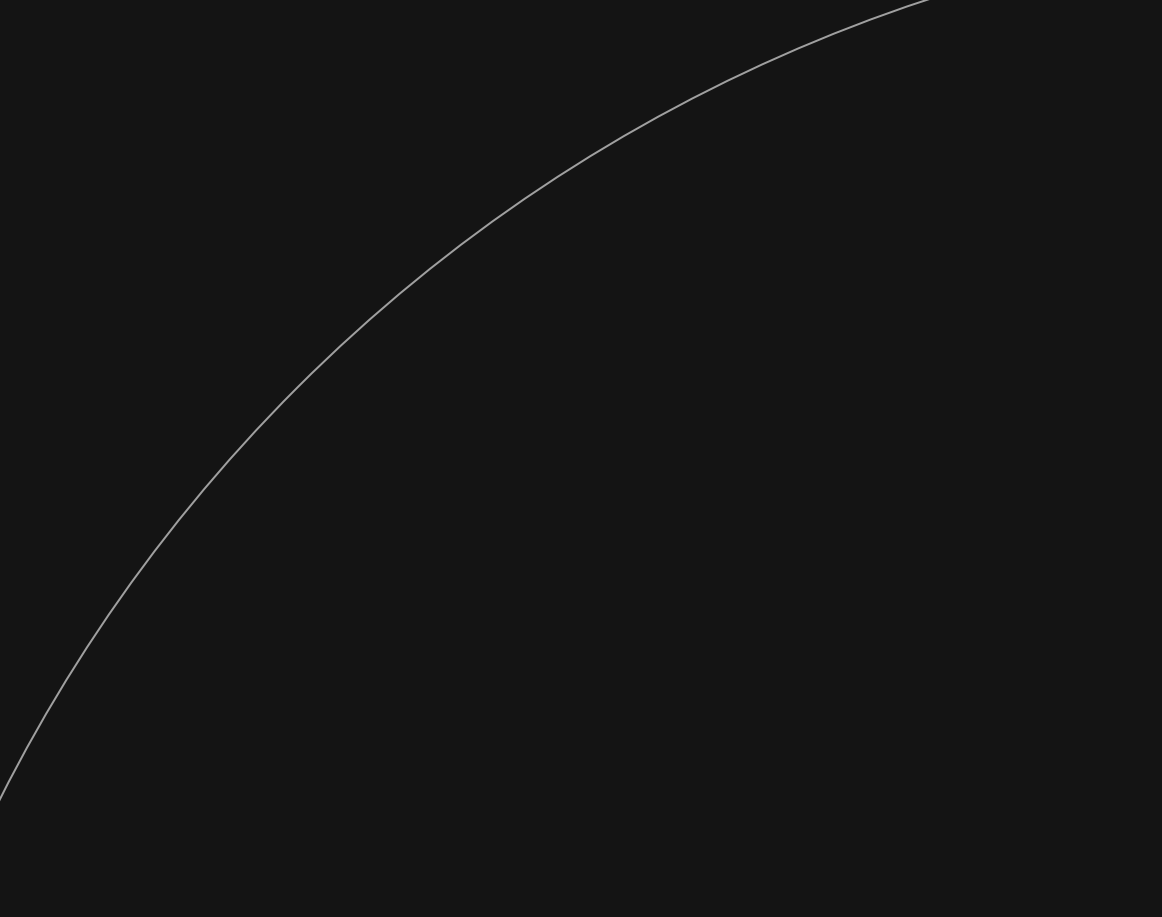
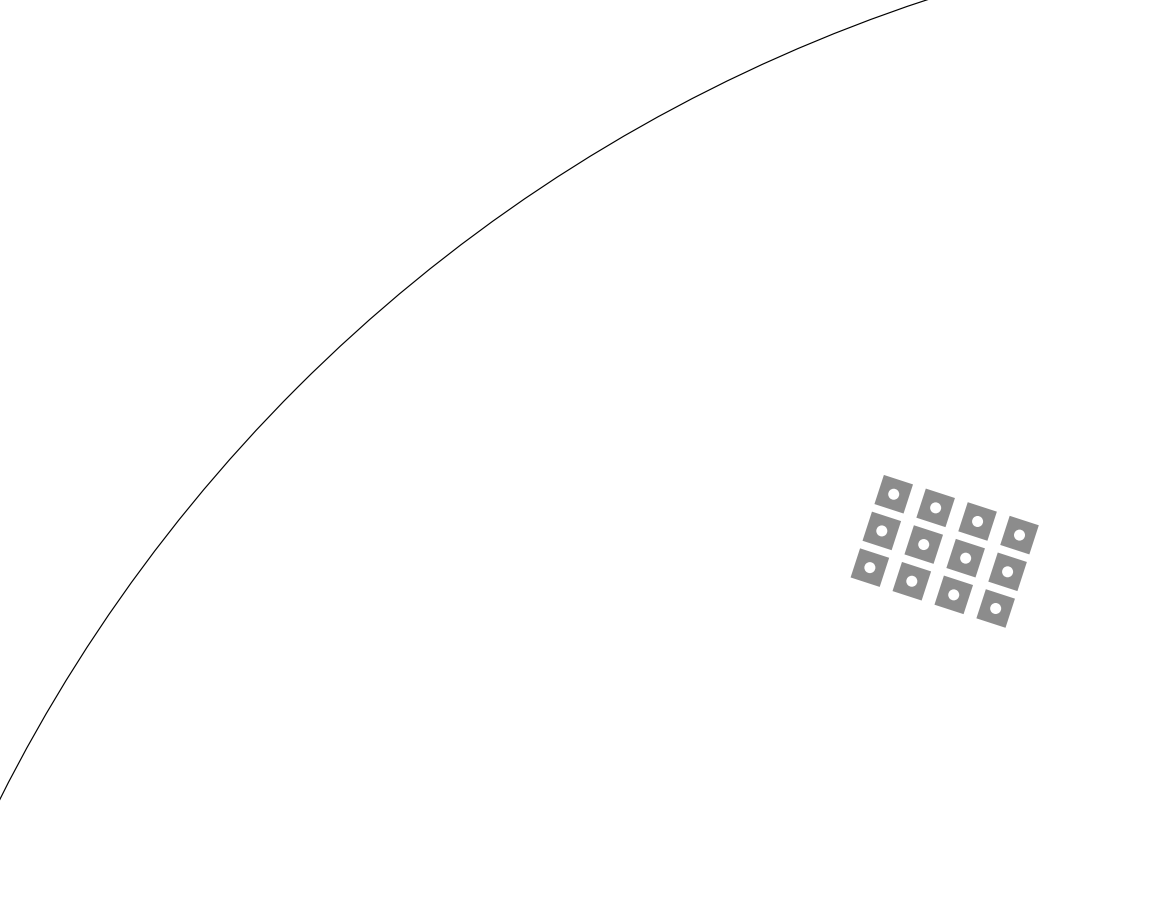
part: none -> (944, 551)

